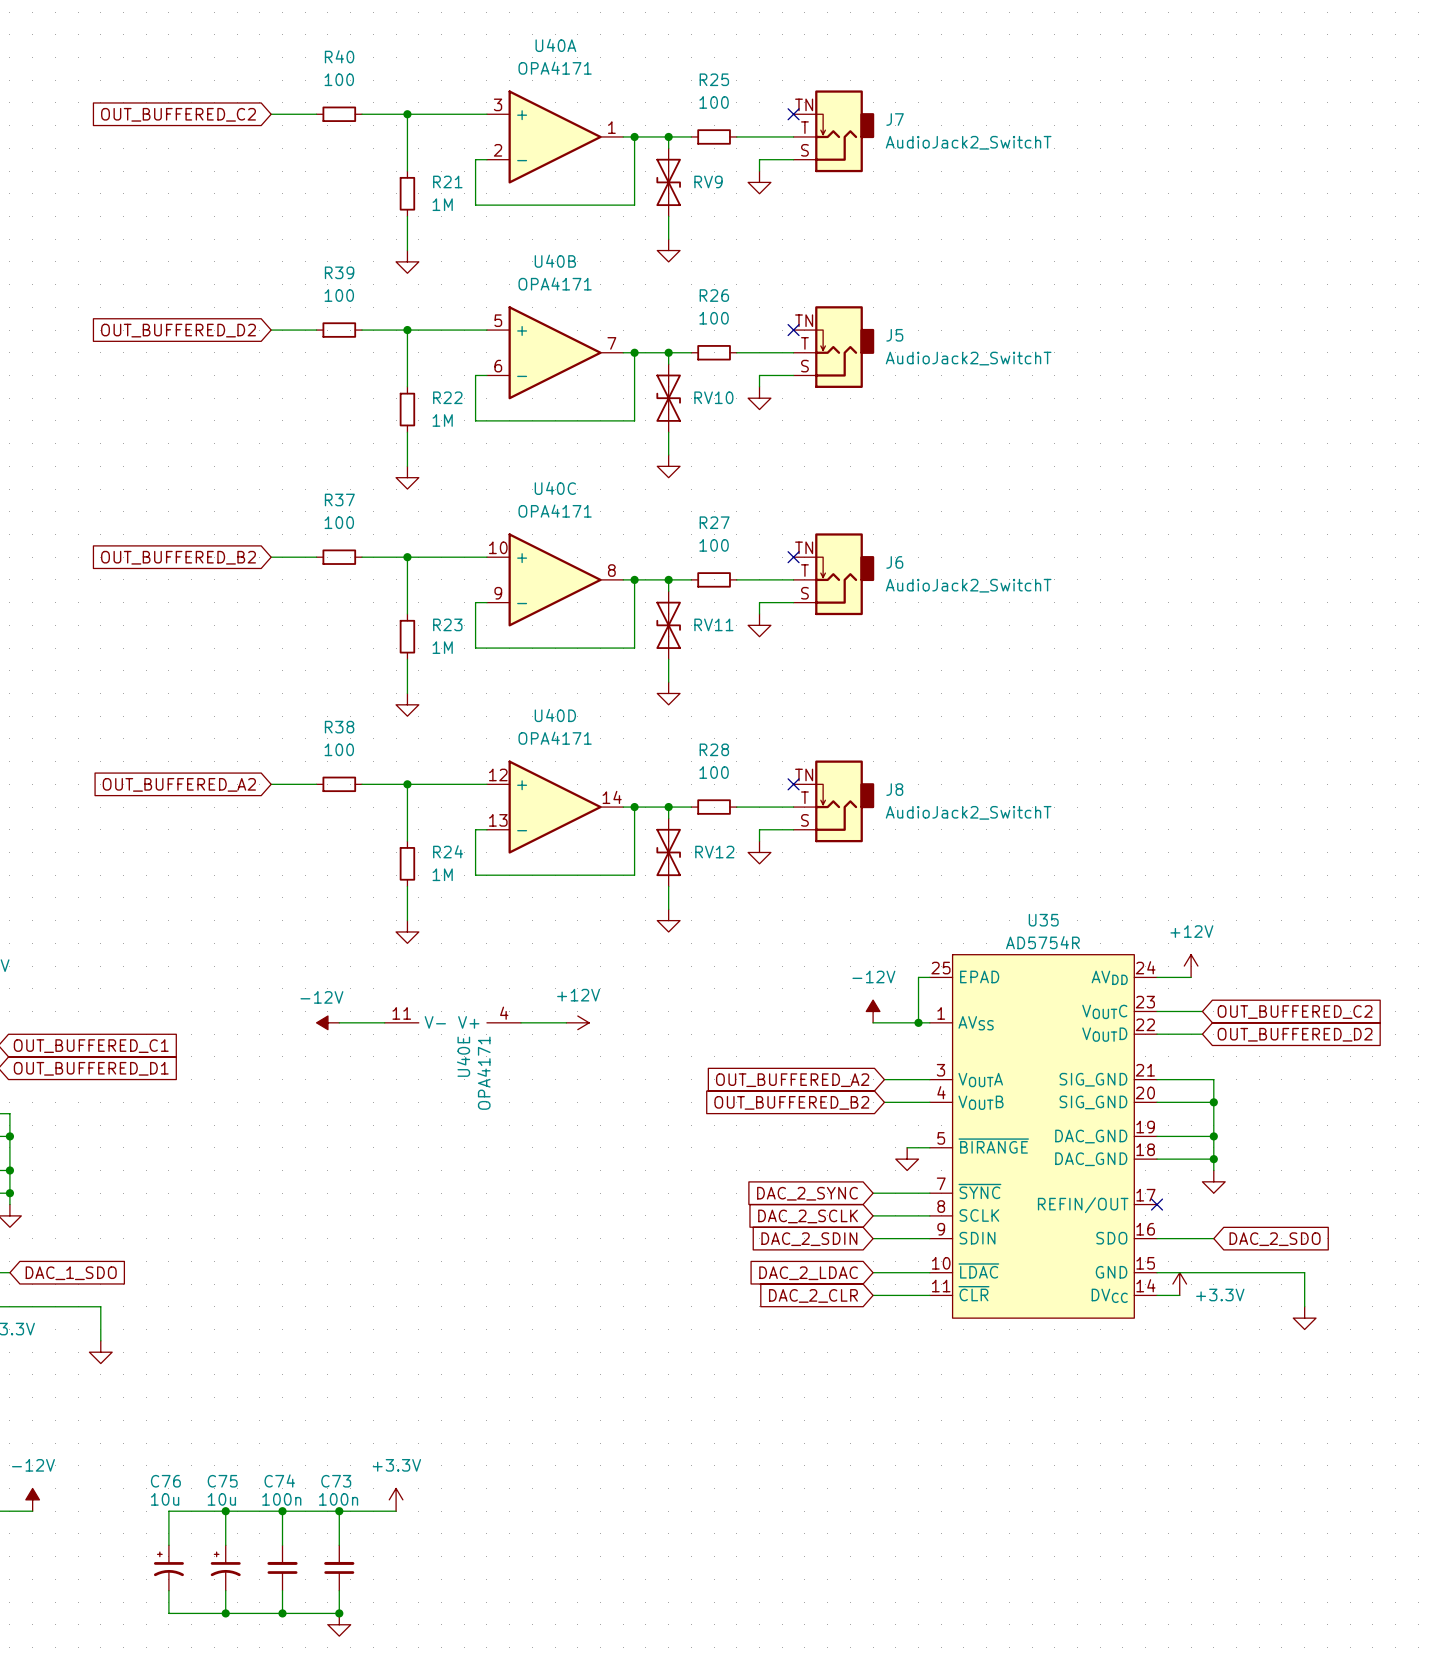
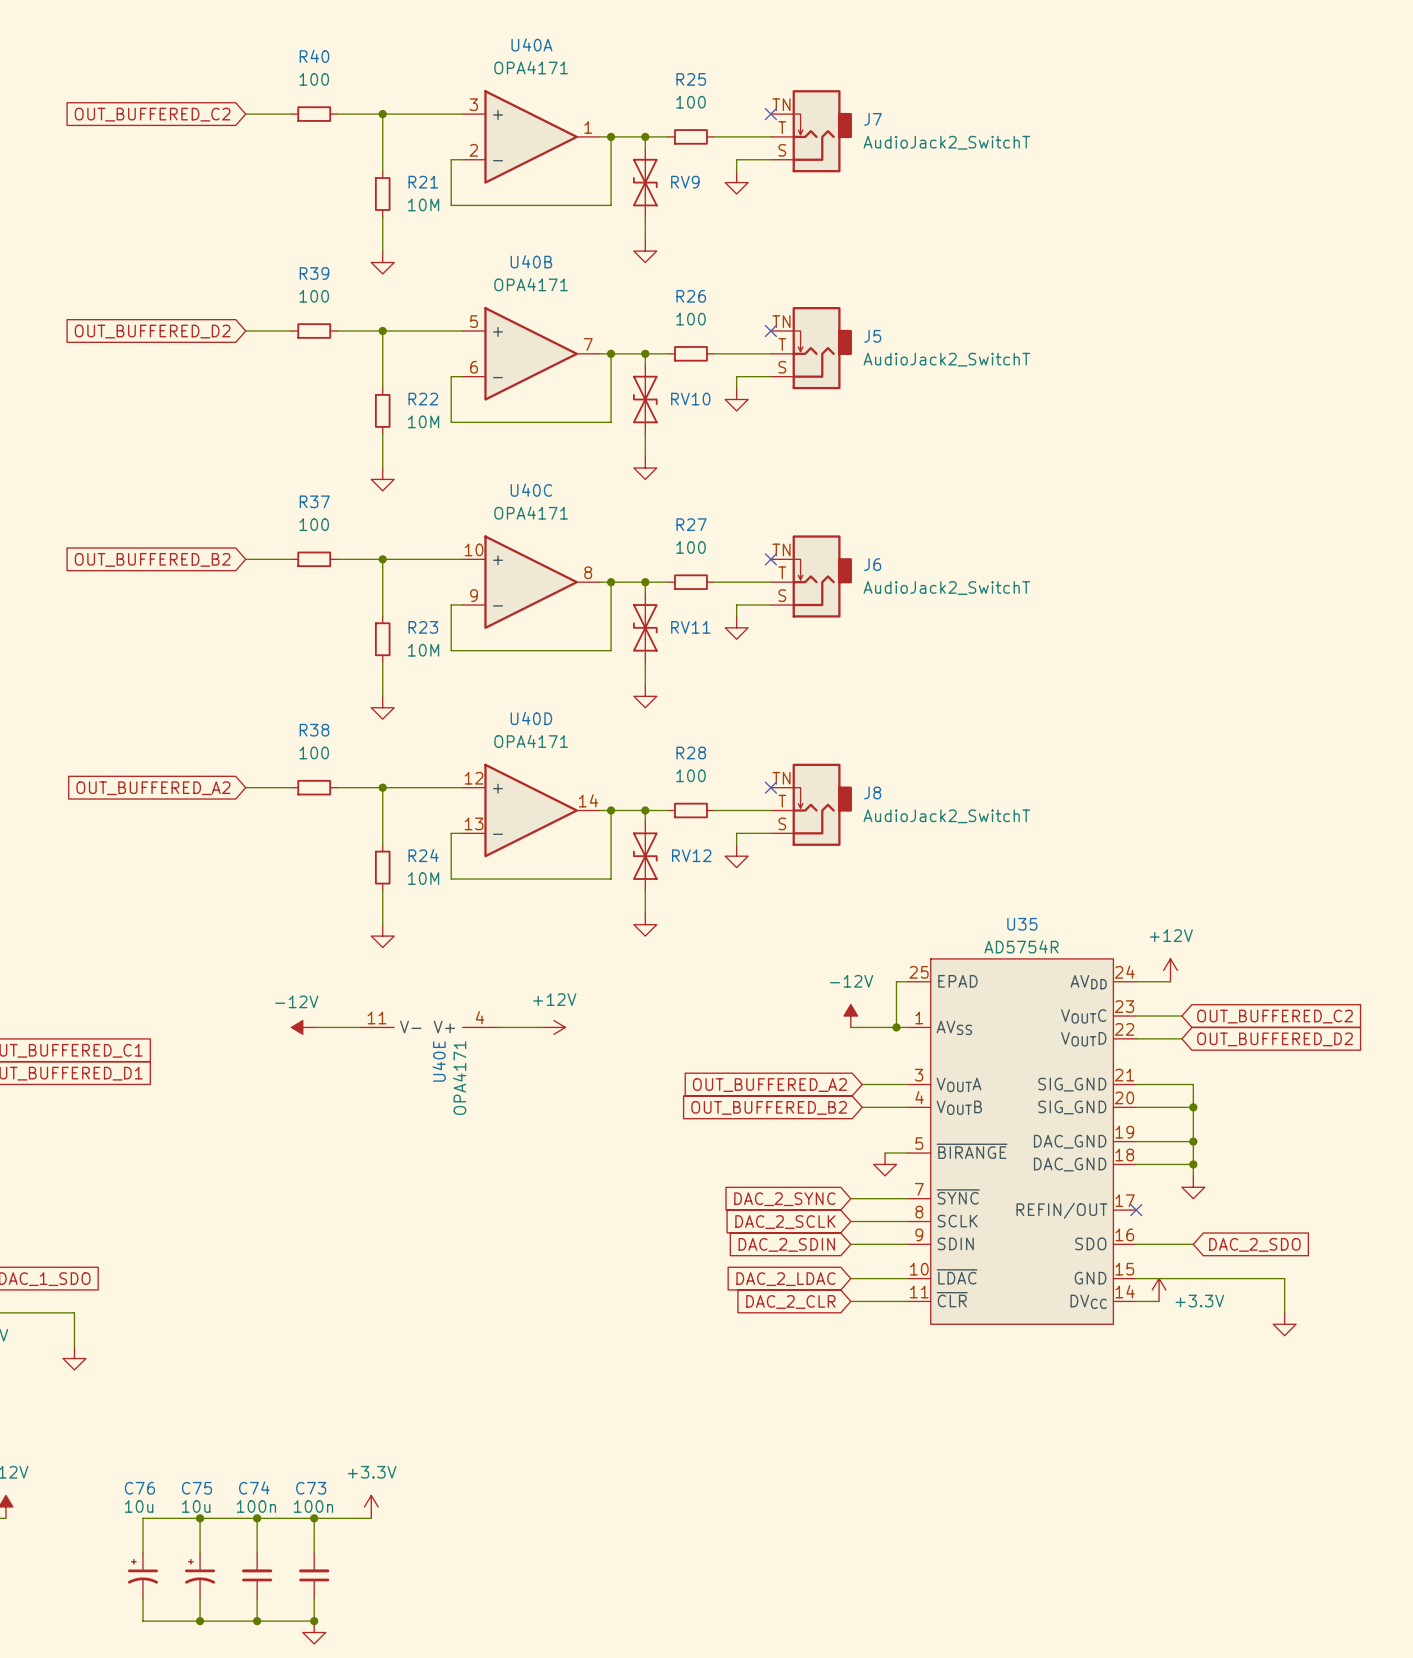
R21 value: 1M (442, 204) -> 10M (423, 204)
R22 value: 1M (442, 420) -> 10M (423, 421)
R23 value: 1M (442, 647) -> 10M (423, 650)
R24 value: 1M (442, 874) -> 10M (423, 878)

